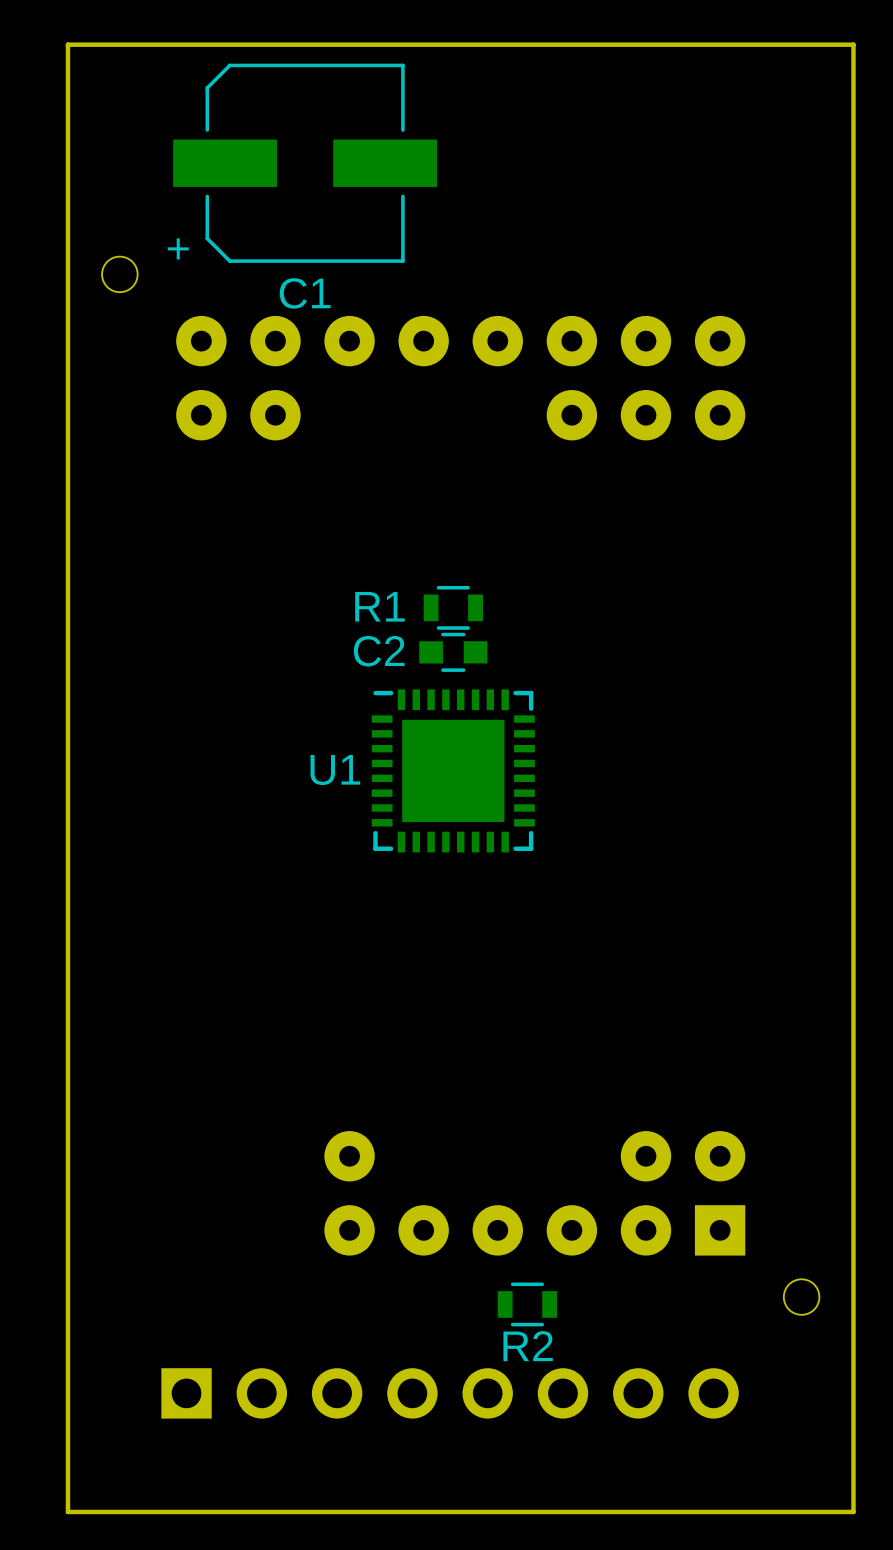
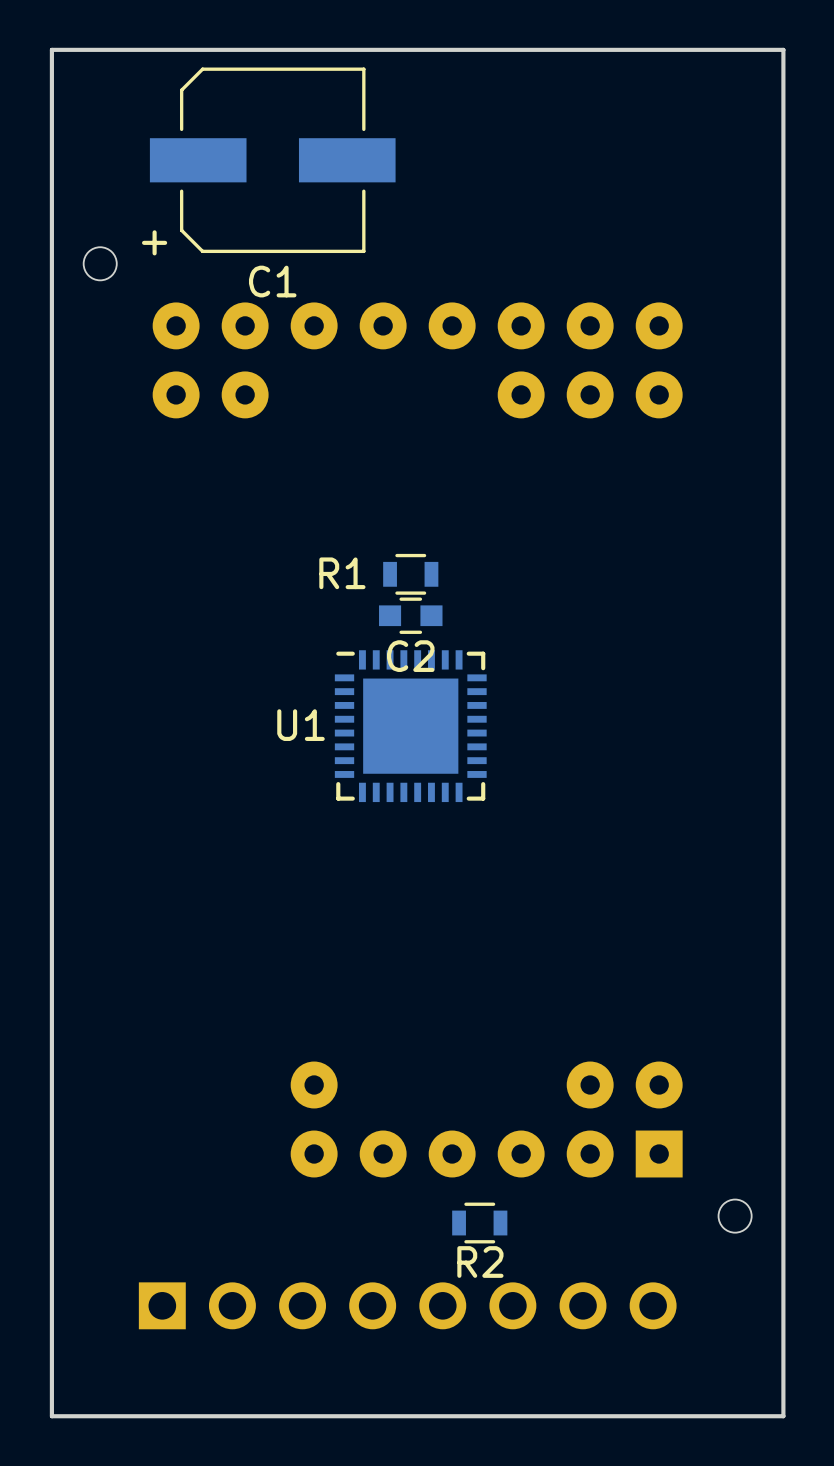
C2 name position: C2 (379, 651) -> C2 (410, 656)

